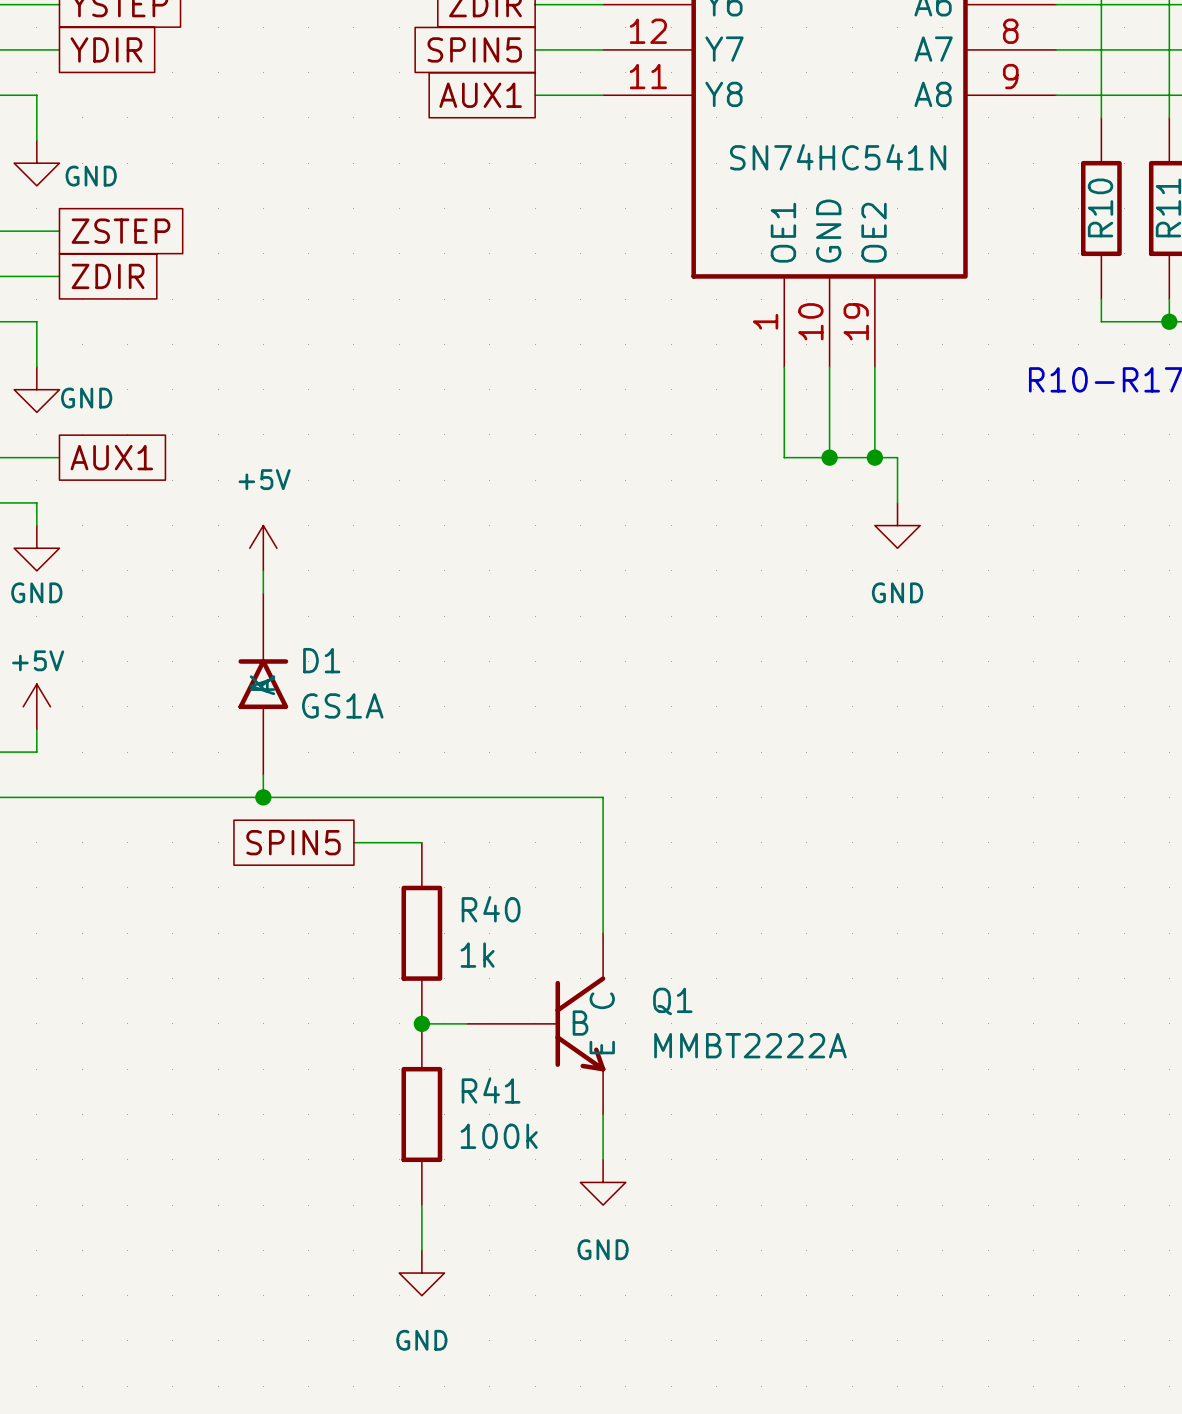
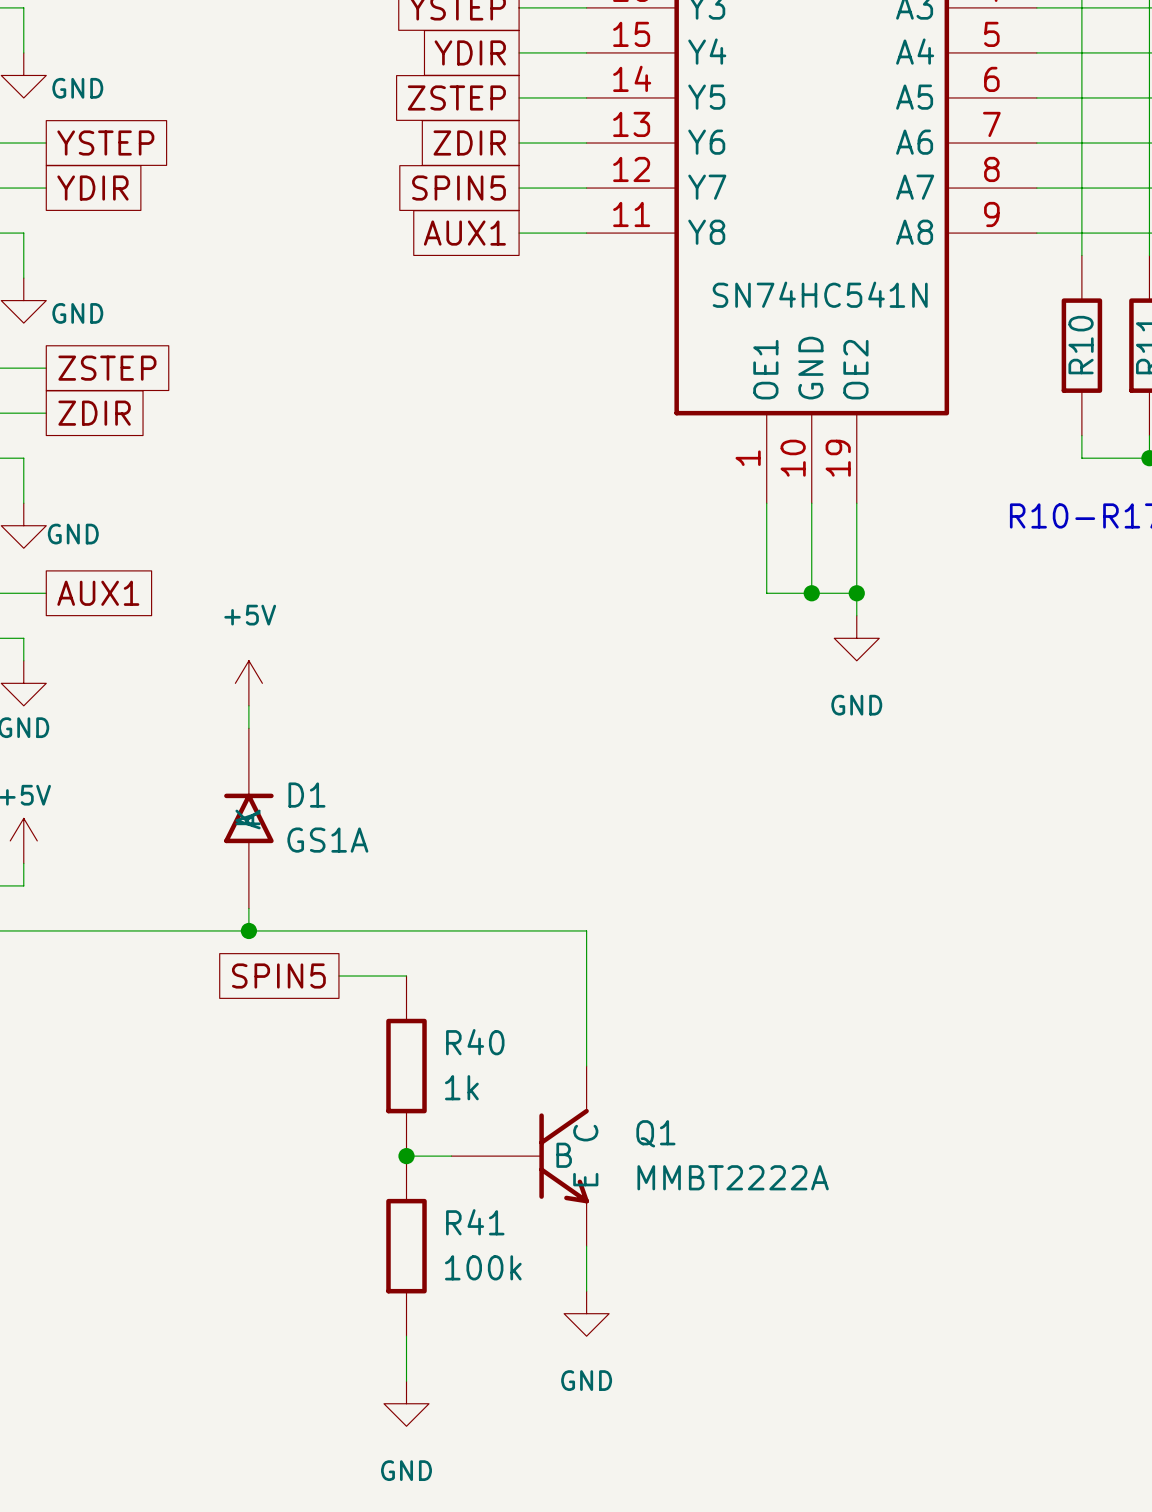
wire: (874, 457) (897, 457) (897, 502) -> (856, 593) (856, 615)
power symbol position: GND (897, 525) -> GND (856, 638)

